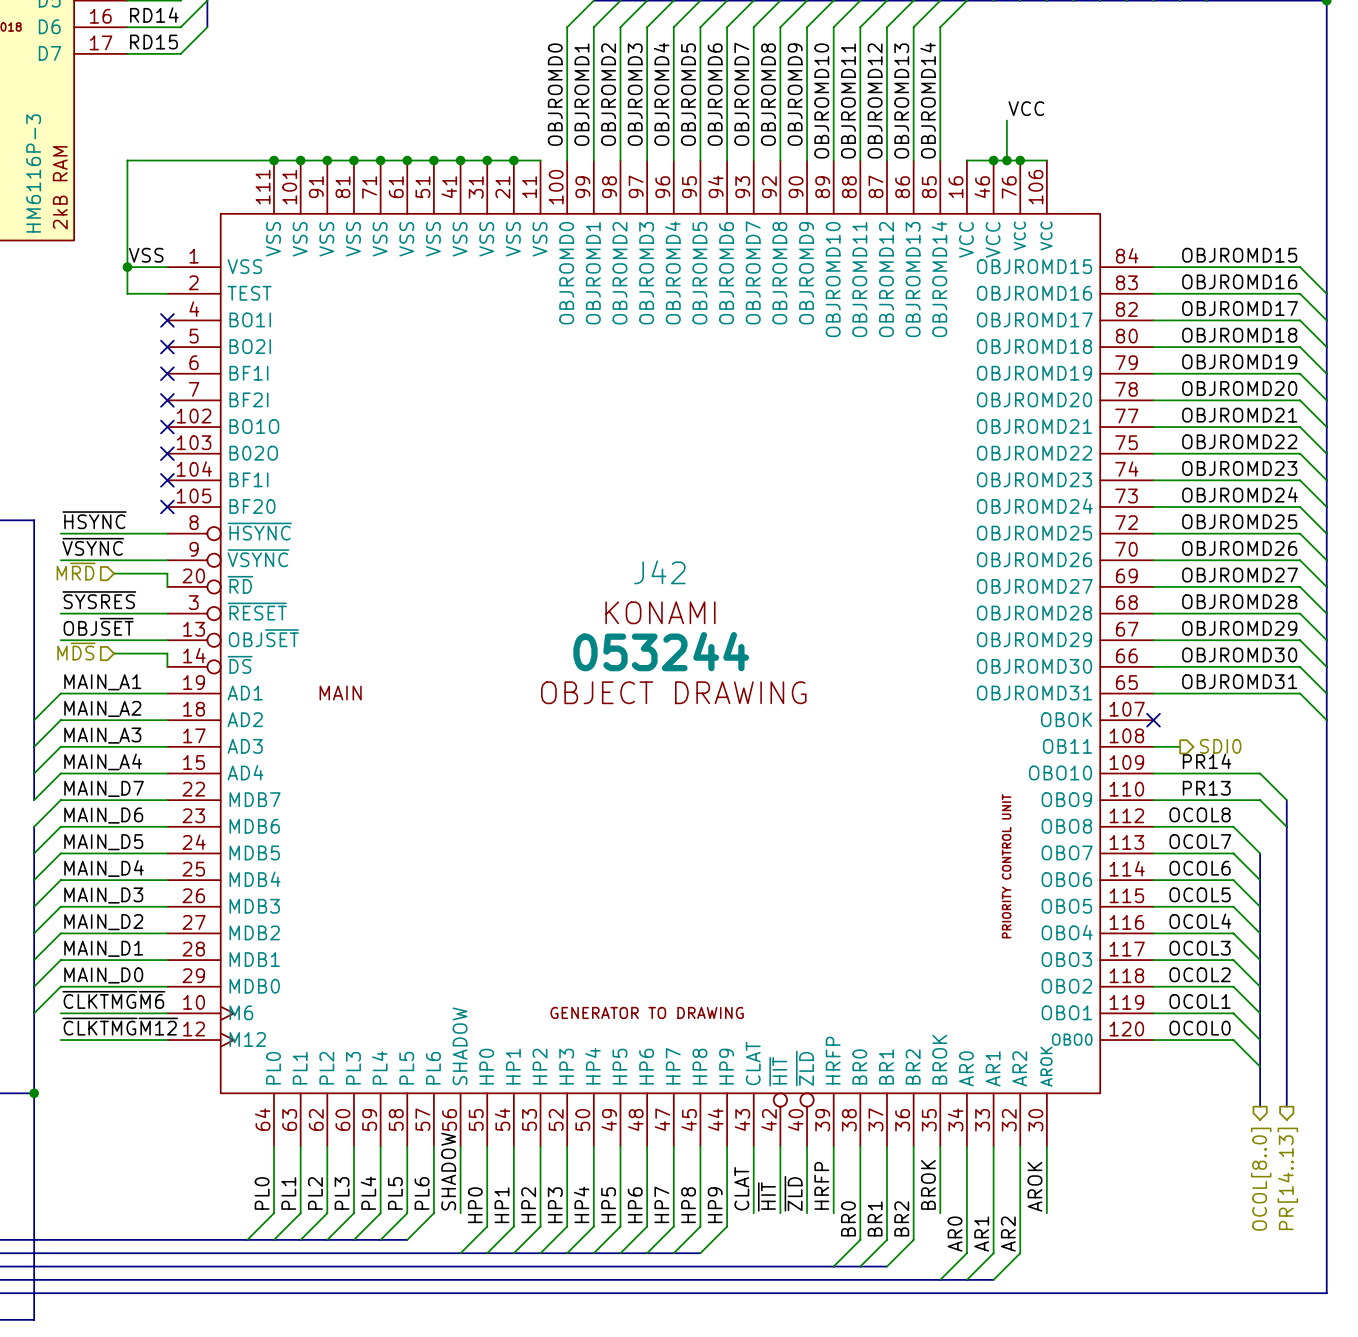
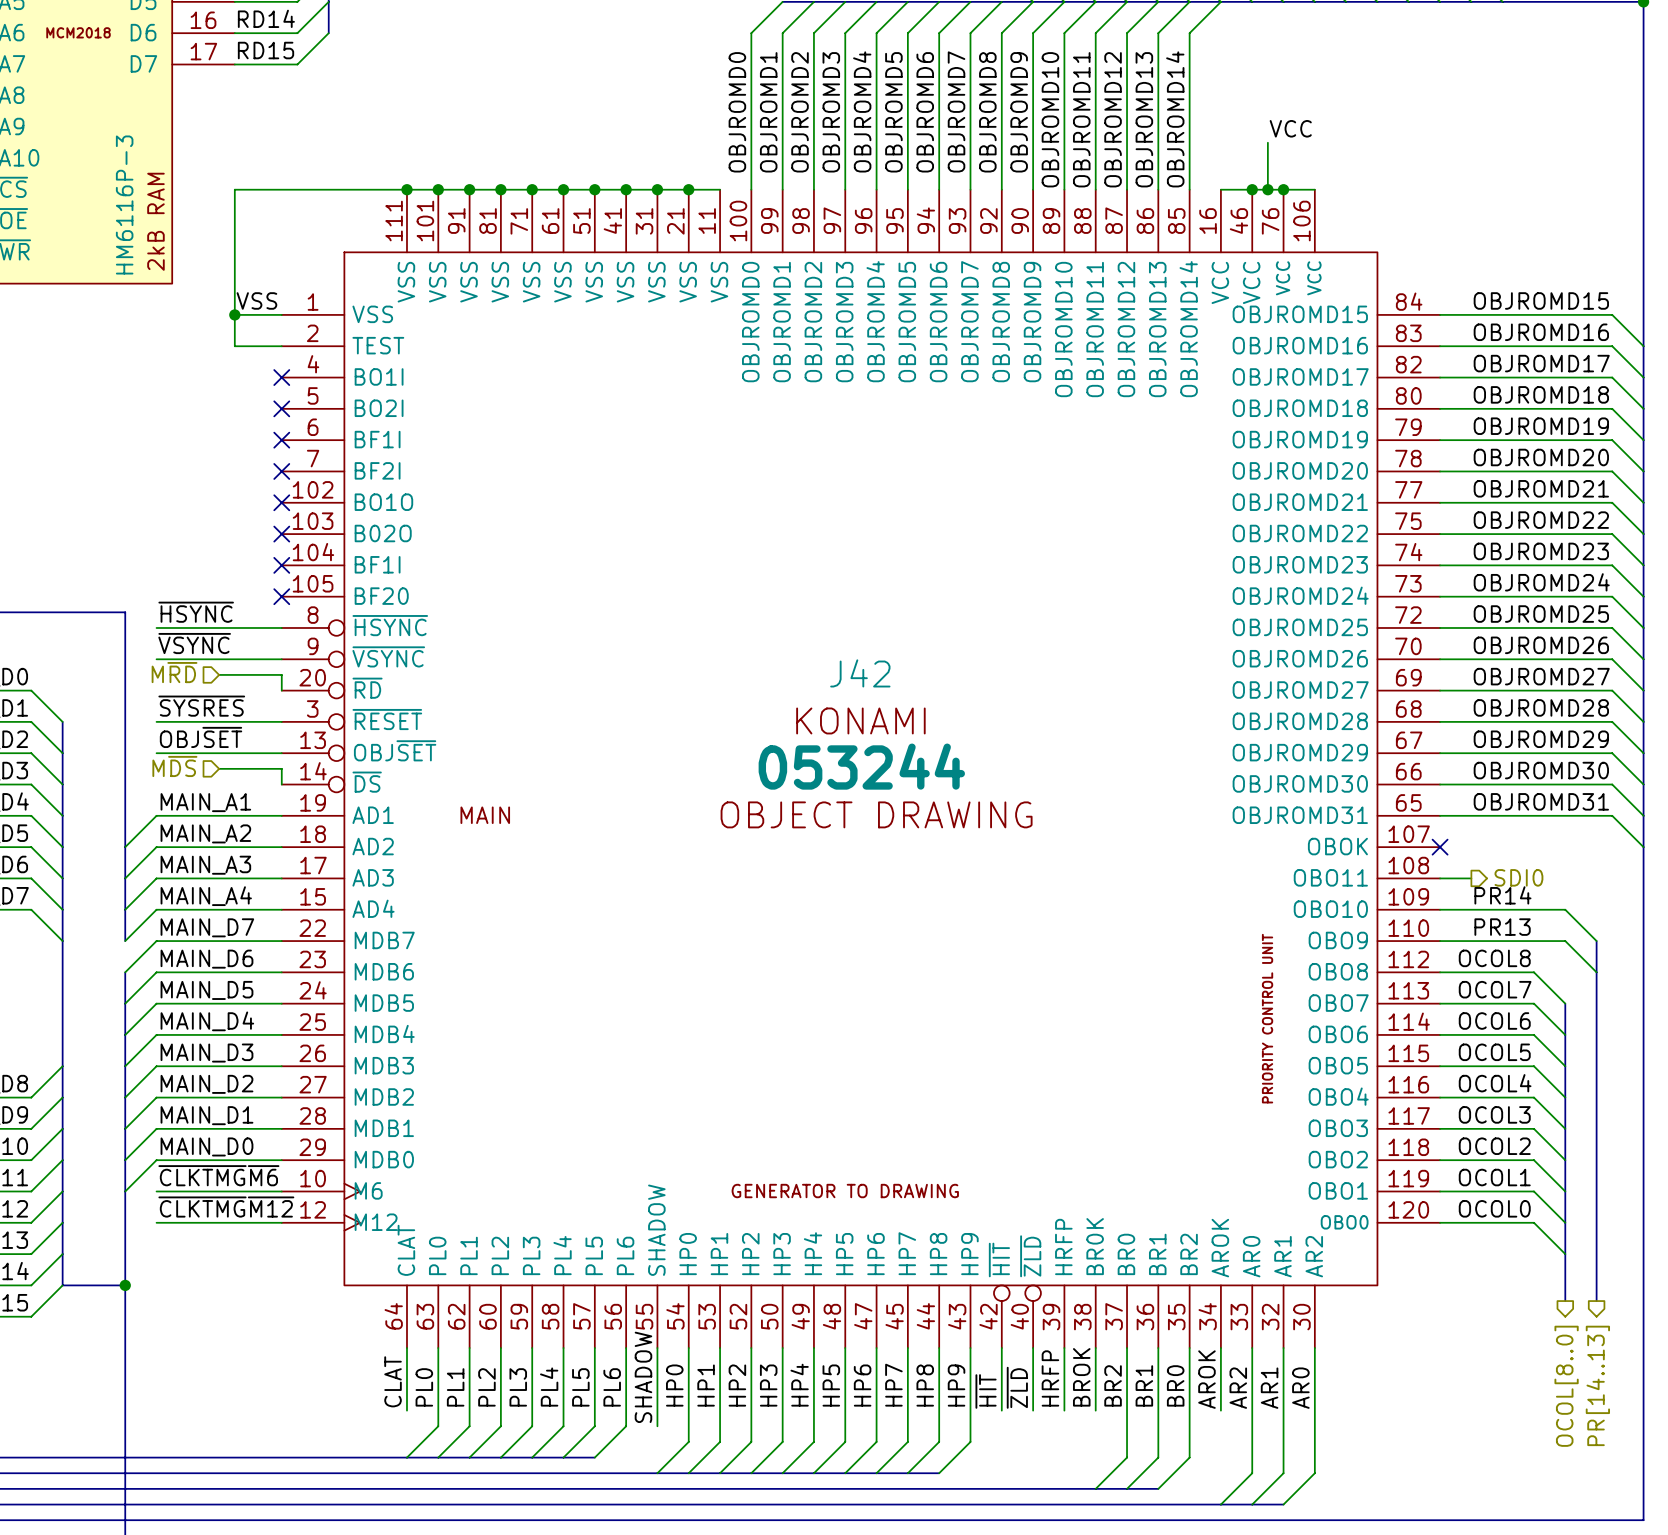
J42 symbol: [167, 160, 1154, 1147] -> [281, 189, 1441, 1349]
label position: SHADOW (448, 1171) -> SHADOW (643, 1377)
label: none -> CLAT (393, 1381)
label position: BROK (928, 1184) -> BROK (1081, 1377)
label position: HRFP (821, 1185) -> HRFP (1050, 1378)
label position: AROK (1035, 1186) -> AROK (1206, 1379)
label: CLAT (741, 1188) -> none
label position: PL0 (262, 1193) -> PL0 (424, 1387)
label position: PL1 (288, 1193) -> PL1 (455, 1387)
label position: PL2 (315, 1193) -> PL2 (486, 1387)
label position: PL3 (342, 1193) -> PL3 (518, 1387)
label position: PL4 (368, 1193) -> PL4 (549, 1387)
label position: PL5 (395, 1193) -> PL5 (580, 1387)
label position: PL6 (422, 1193) -> PL6 (612, 1387)
label position: ~{ZLD} (793, 1193) -> ~{ZLD} (1017, 1387)
label position: ~{HIT} (766, 1196) -> ~{HIT} (986, 1391)
wire: (274, 1199) (274, 1213) (247, 1239) -> none
wire: (780, 1199) (780, 1213) -> none
wire: (807, 1199) (807, 1213) -> none
wire: (833, 1199) (833, 1213) -> none
wire: (860, 1199) (860, 1239) (833, 1266) -> (1314, 1426) (1314, 1473) (1283, 1504)
wire: (966, 1199) (966, 1253) (940, 1279) -> none
label position: HP4 (581, 1204) -> HP4 (799, 1385)
label position: HP7 (661, 1204) -> HP7 (893, 1385)
label position: HP0 (475, 1205) -> HP0 (674, 1385)
label position: HP1 (501, 1205) -> HP1 (706, 1385)
label position: HP2 (528, 1205) -> HP2 (737, 1385)
label position: HP3 (555, 1205) -> HP3 (768, 1385)
label position: HP5 (608, 1205) -> HP5 (831, 1385)
label position: HP6 (635, 1205) -> HP6 (862, 1385)
label position: HP8 (688, 1205) -> HP8 (925, 1385)
label position: HP9 (715, 1205) -> HP9 (956, 1385)
wire: none -> (626, 1426) (594, 1457)
wire: (487, 1213) (487, 1226) (460, 1253) -> none
wire: none -> (970, 1426) (970, 1441) (939, 1473)
wire: none -> (1189, 1426) (1189, 1457) (1158, 1488)
label position: BR0 (848, 1218) -> BR0 (1175, 1385)
label position: BR1 (875, 1218) -> BR1 (1144, 1385)
label position: BR2 (901, 1218) -> BR2 (1113, 1385)
label position: AR0 (955, 1234) -> AR0 (1300, 1388)
label position: AR1 (981, 1234) -> AR1 (1269, 1388)
label position: AR2 (1008, 1234) -> AR2 (1238, 1388)
bus: none -> (563, 1457) (594, 1457)
bus: none -> (907, 1473) (939, 1473)
bus: none -> (1127, 1488) (1158, 1488)
bus: none -> (1252, 1504) (1283, 1504)

